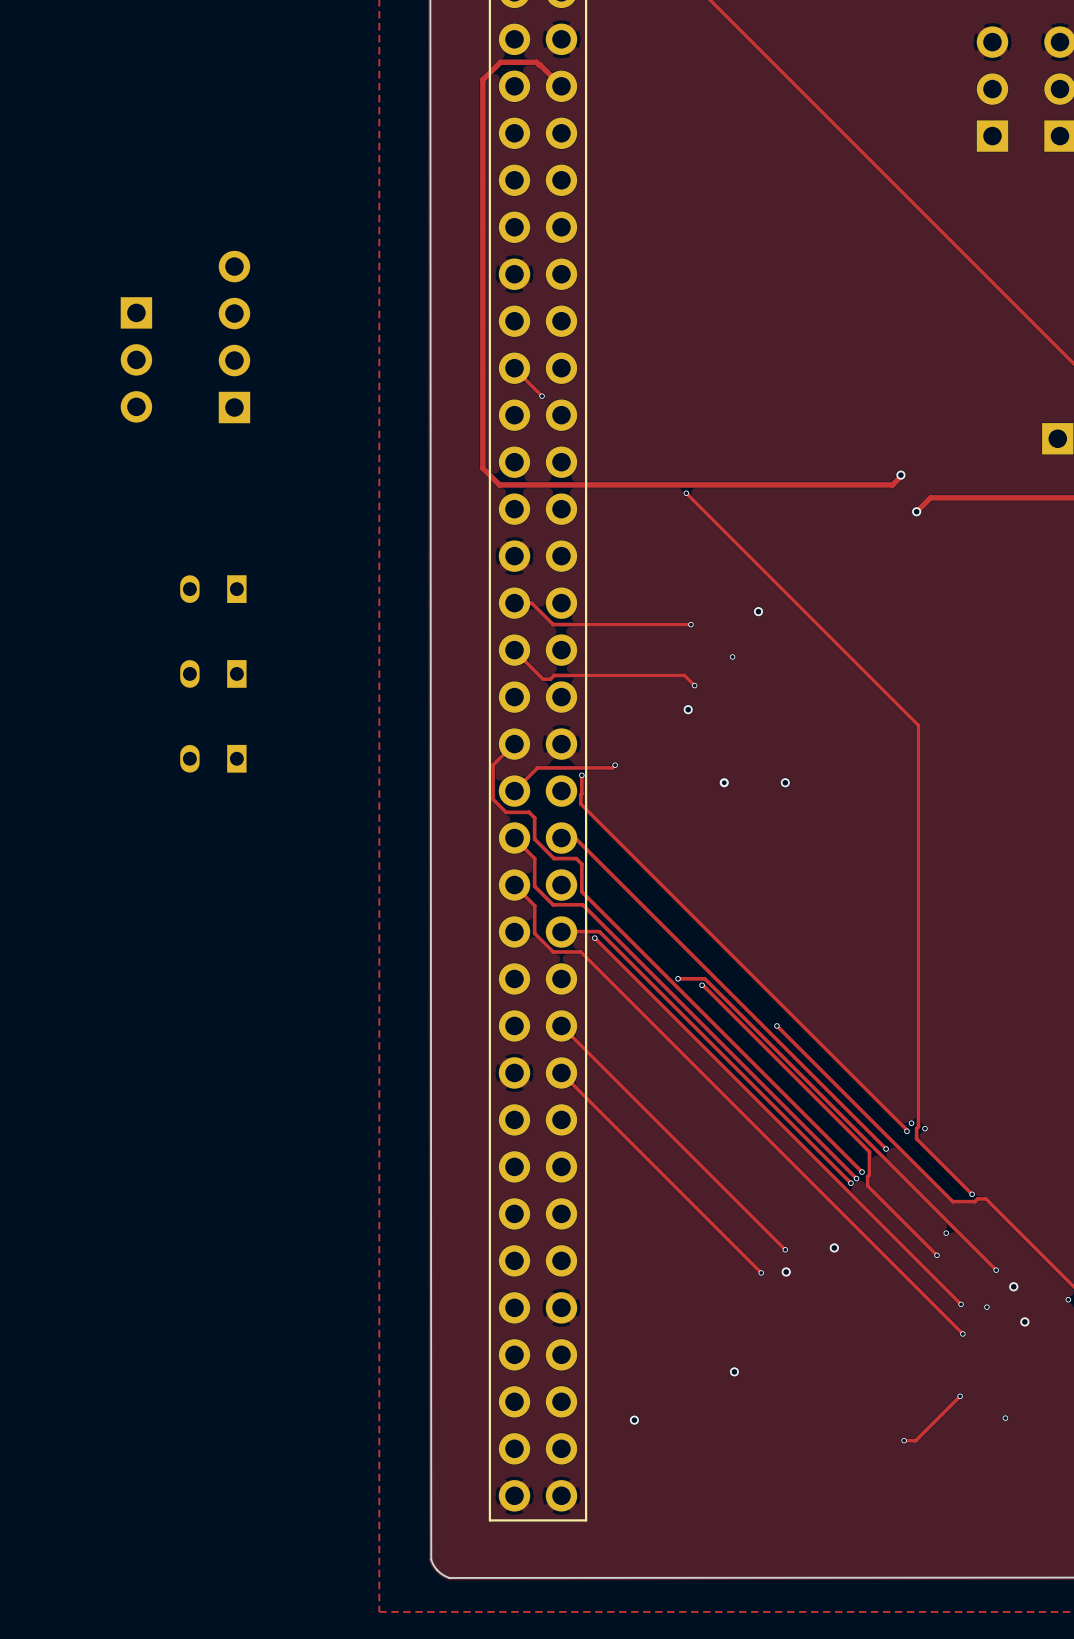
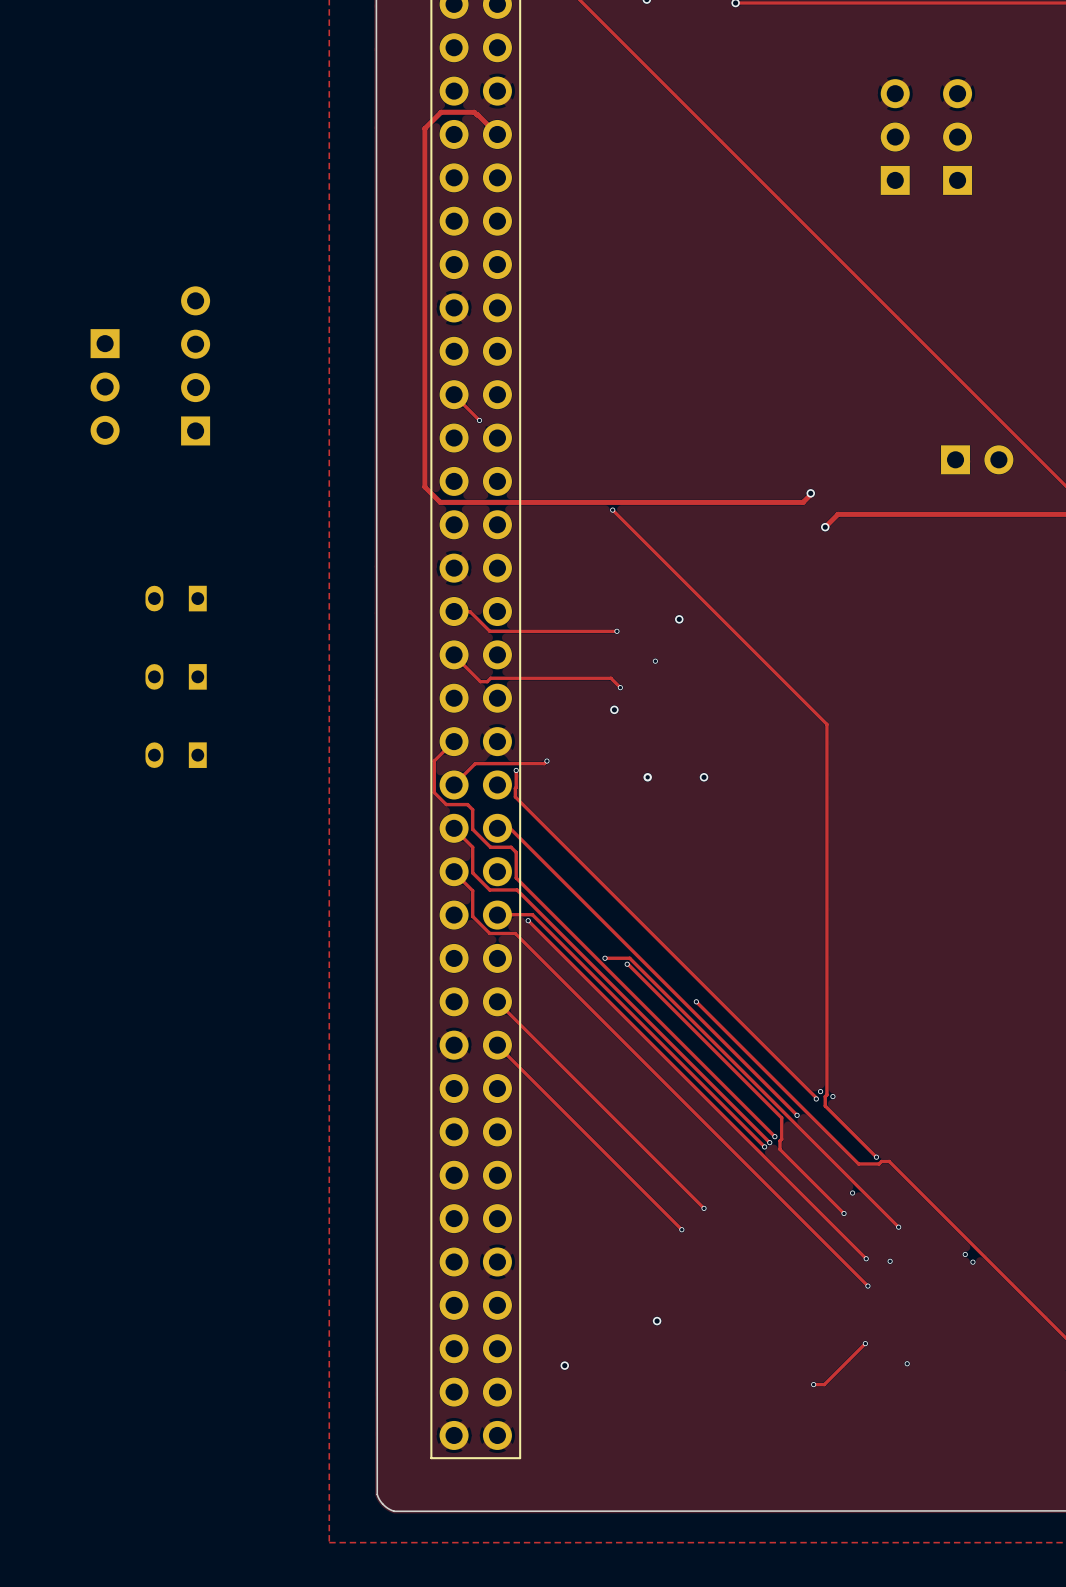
via: (834, 1247) -> none
via: (786, 1271) -> none
via: (1013, 1286) -> none
via: (1024, 1321) -> none

